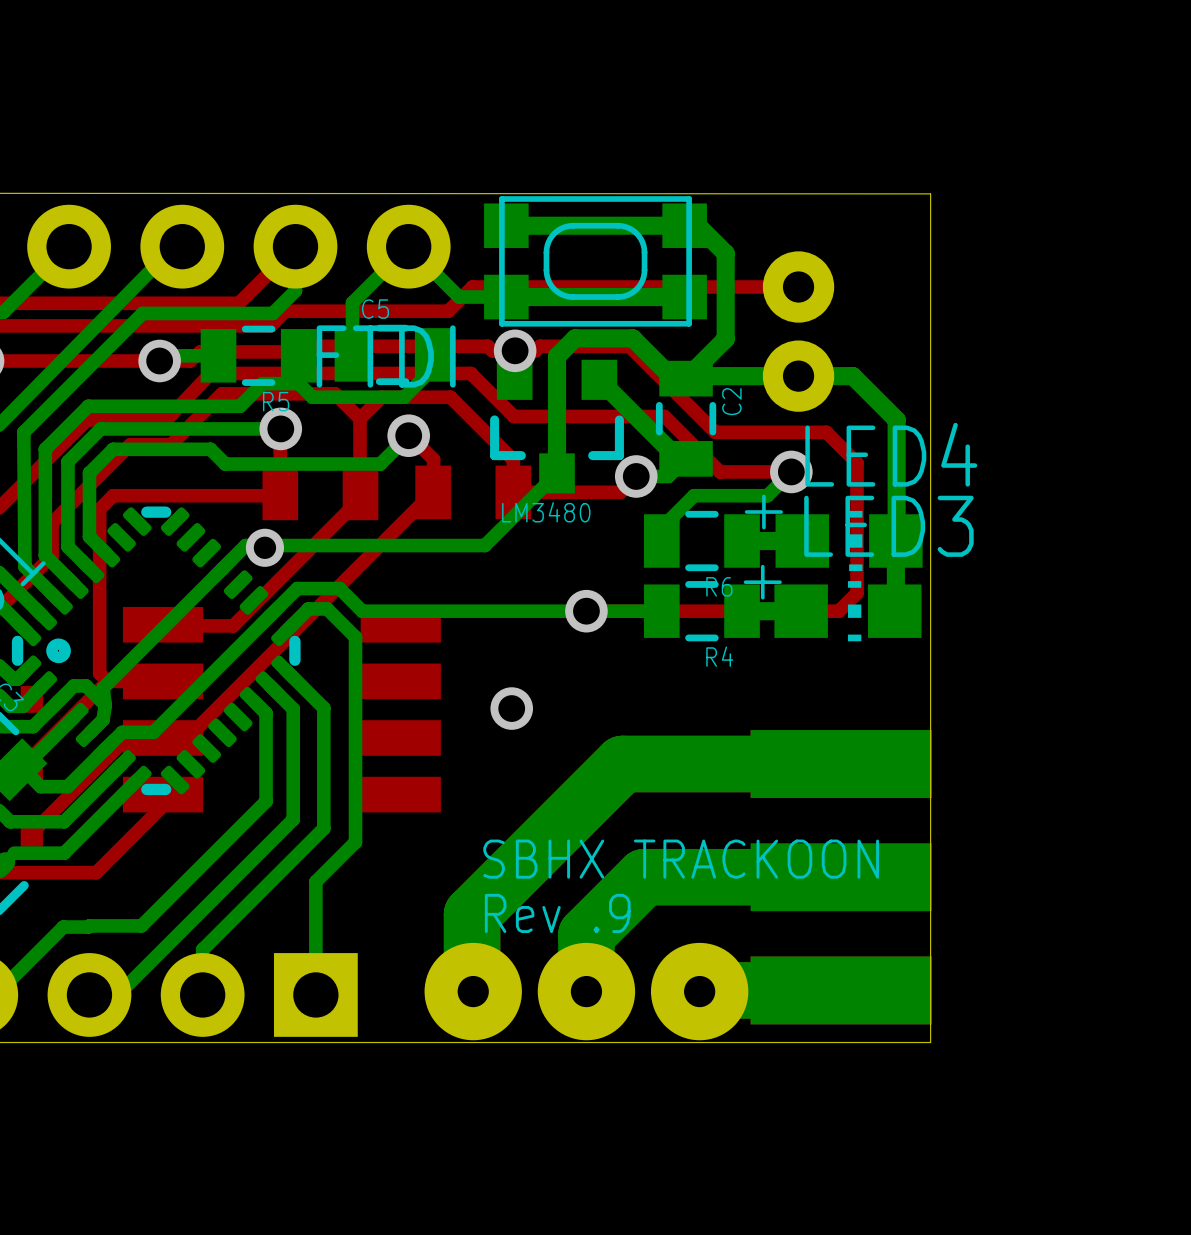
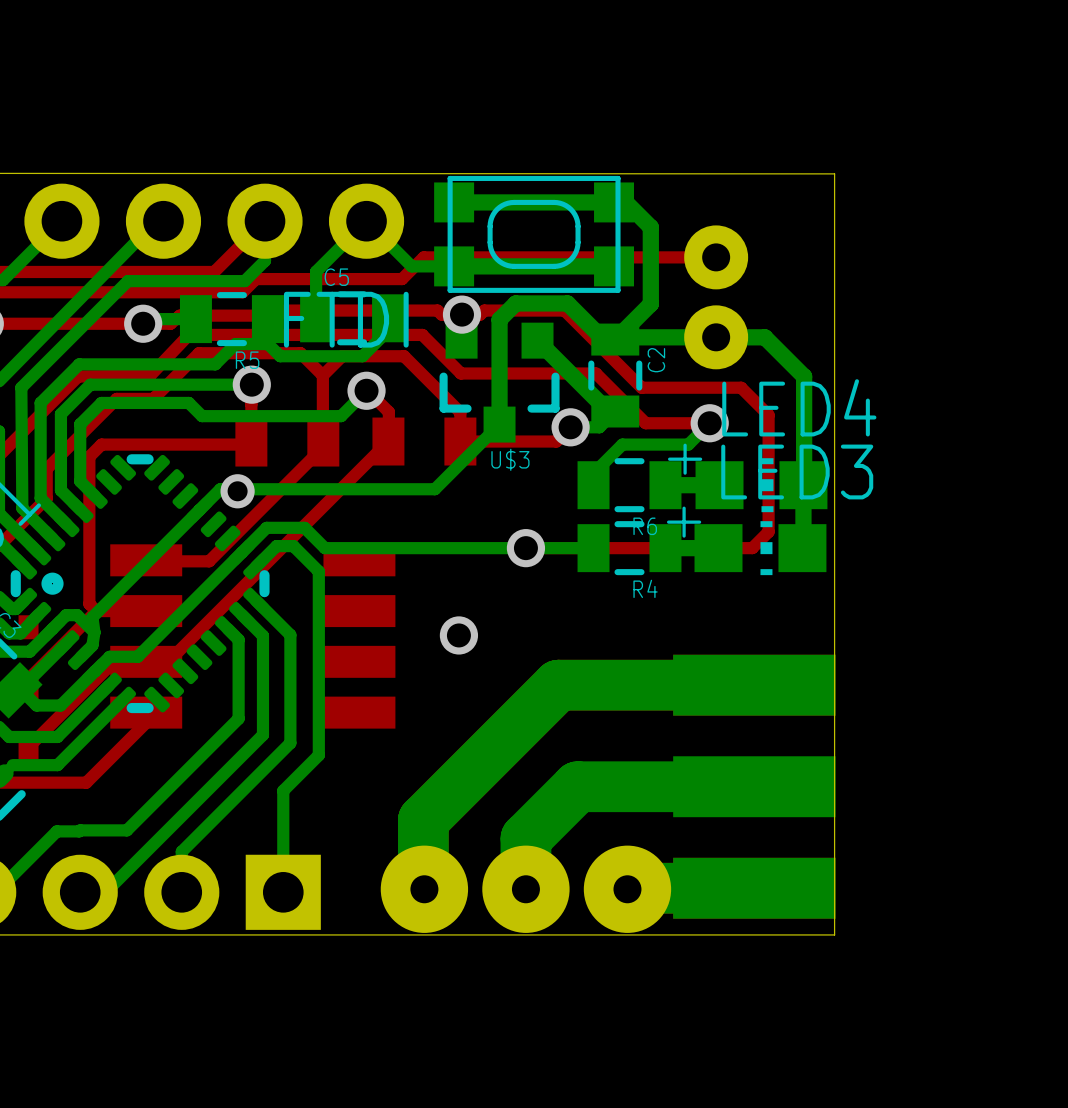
LM3480 name: LM3480 (546, 512) -> U$3 (510, 459)
text: SBHX TRACKOON (681, 859) -> none
text: Rev .9 (557, 913) -> none

